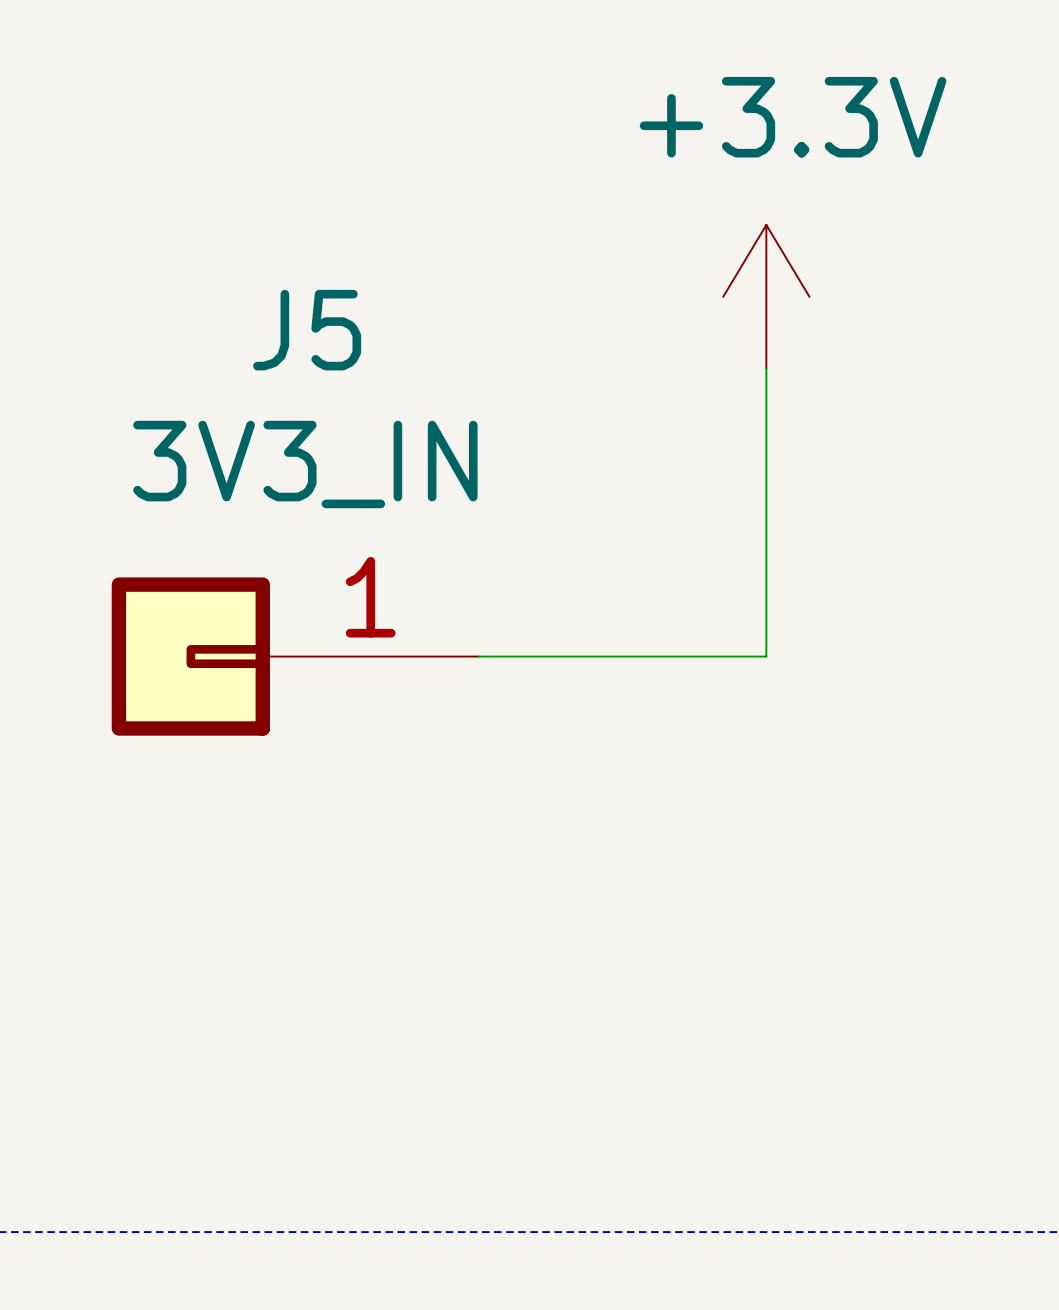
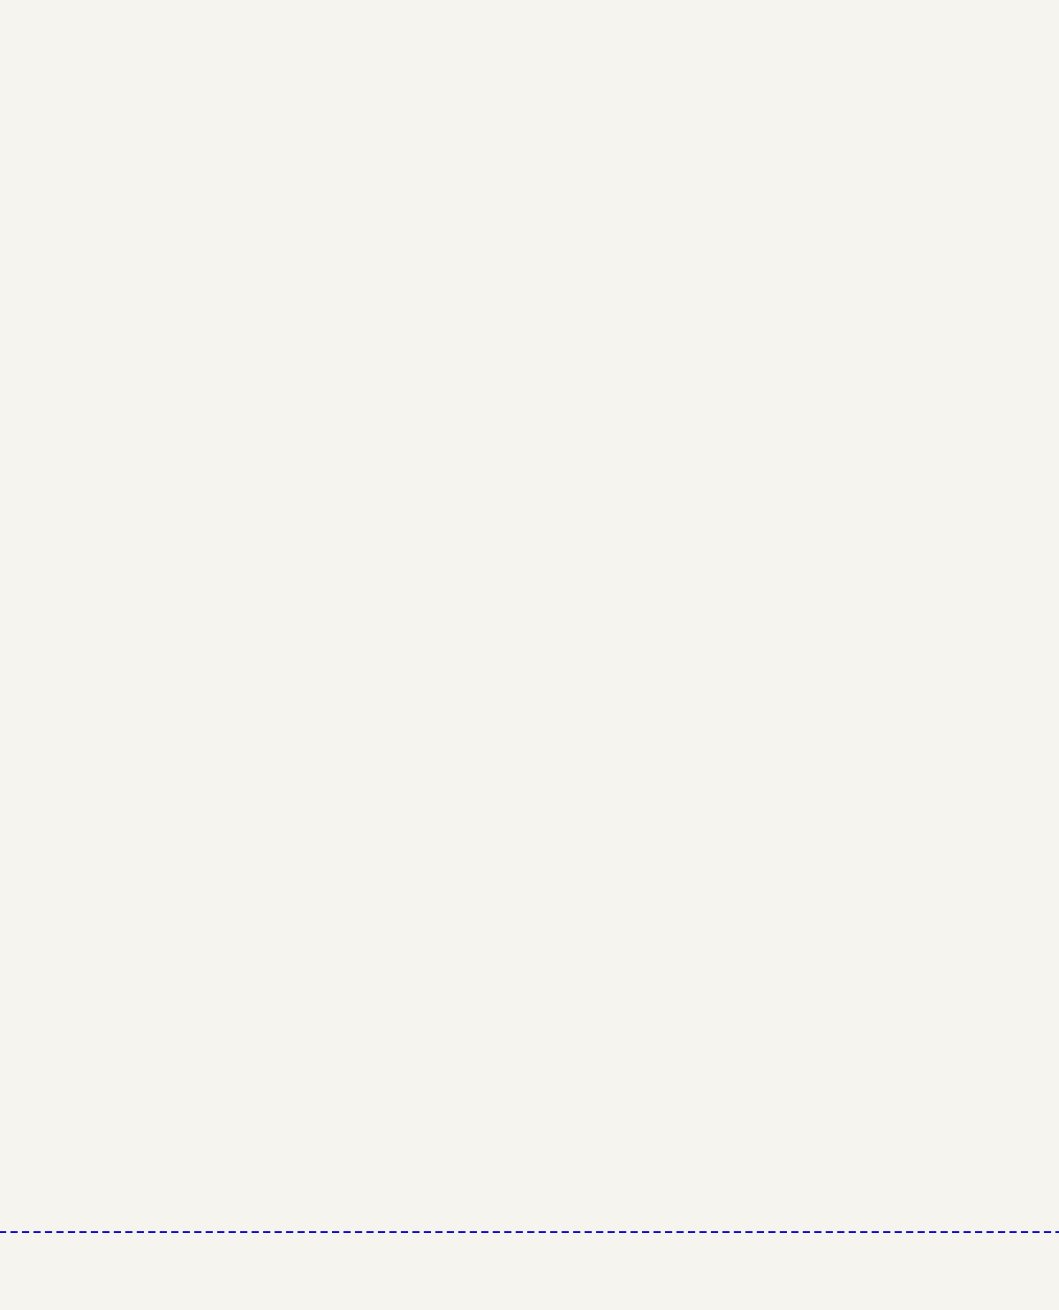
power symbol: +3.3V (766, 296) -> none
wire: (766, 368) (766, 656) (478, 656) -> none
J5: 3V3_IN (295, 656) -> none

